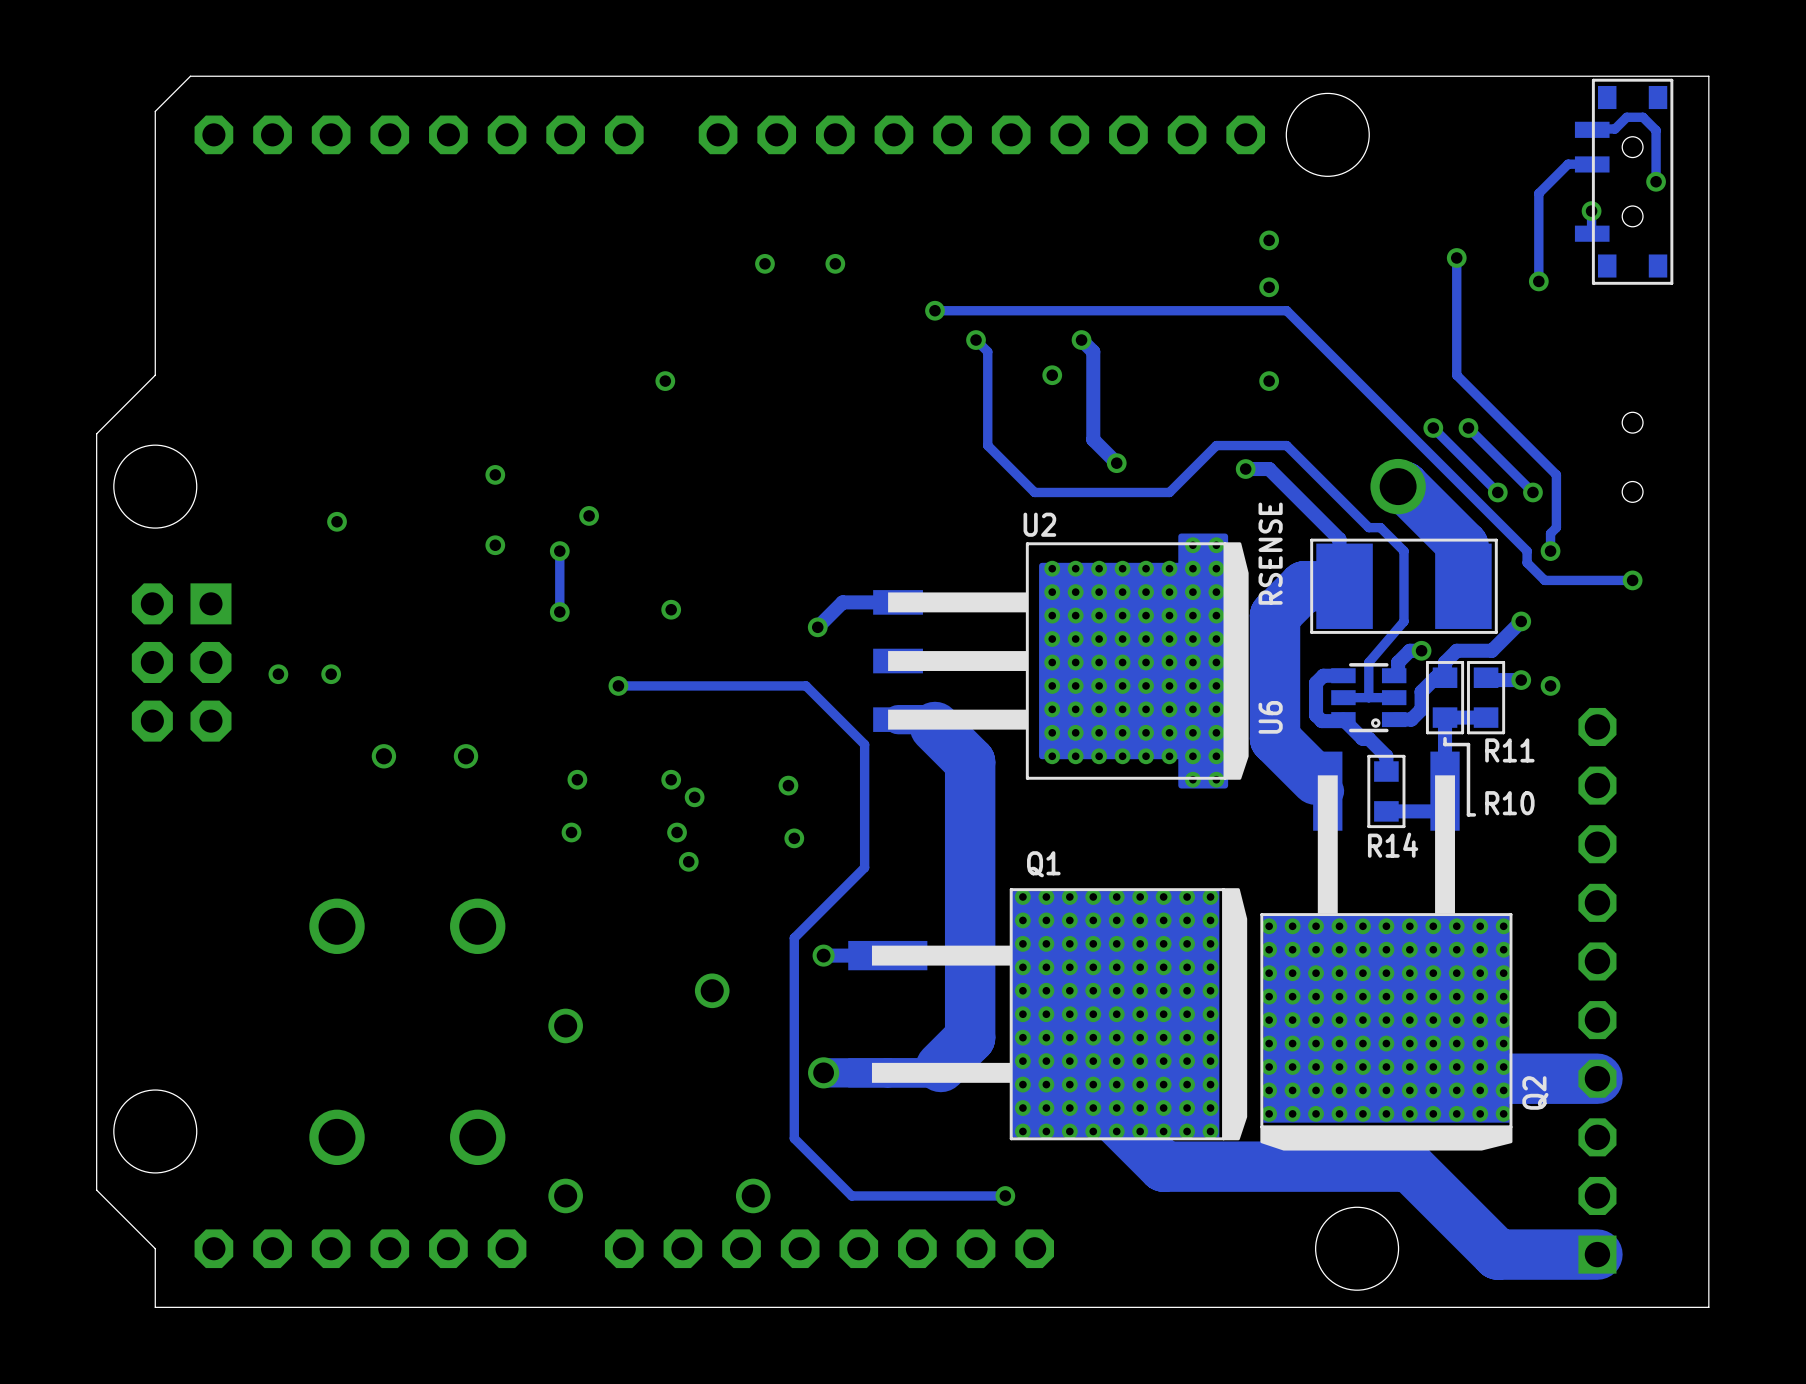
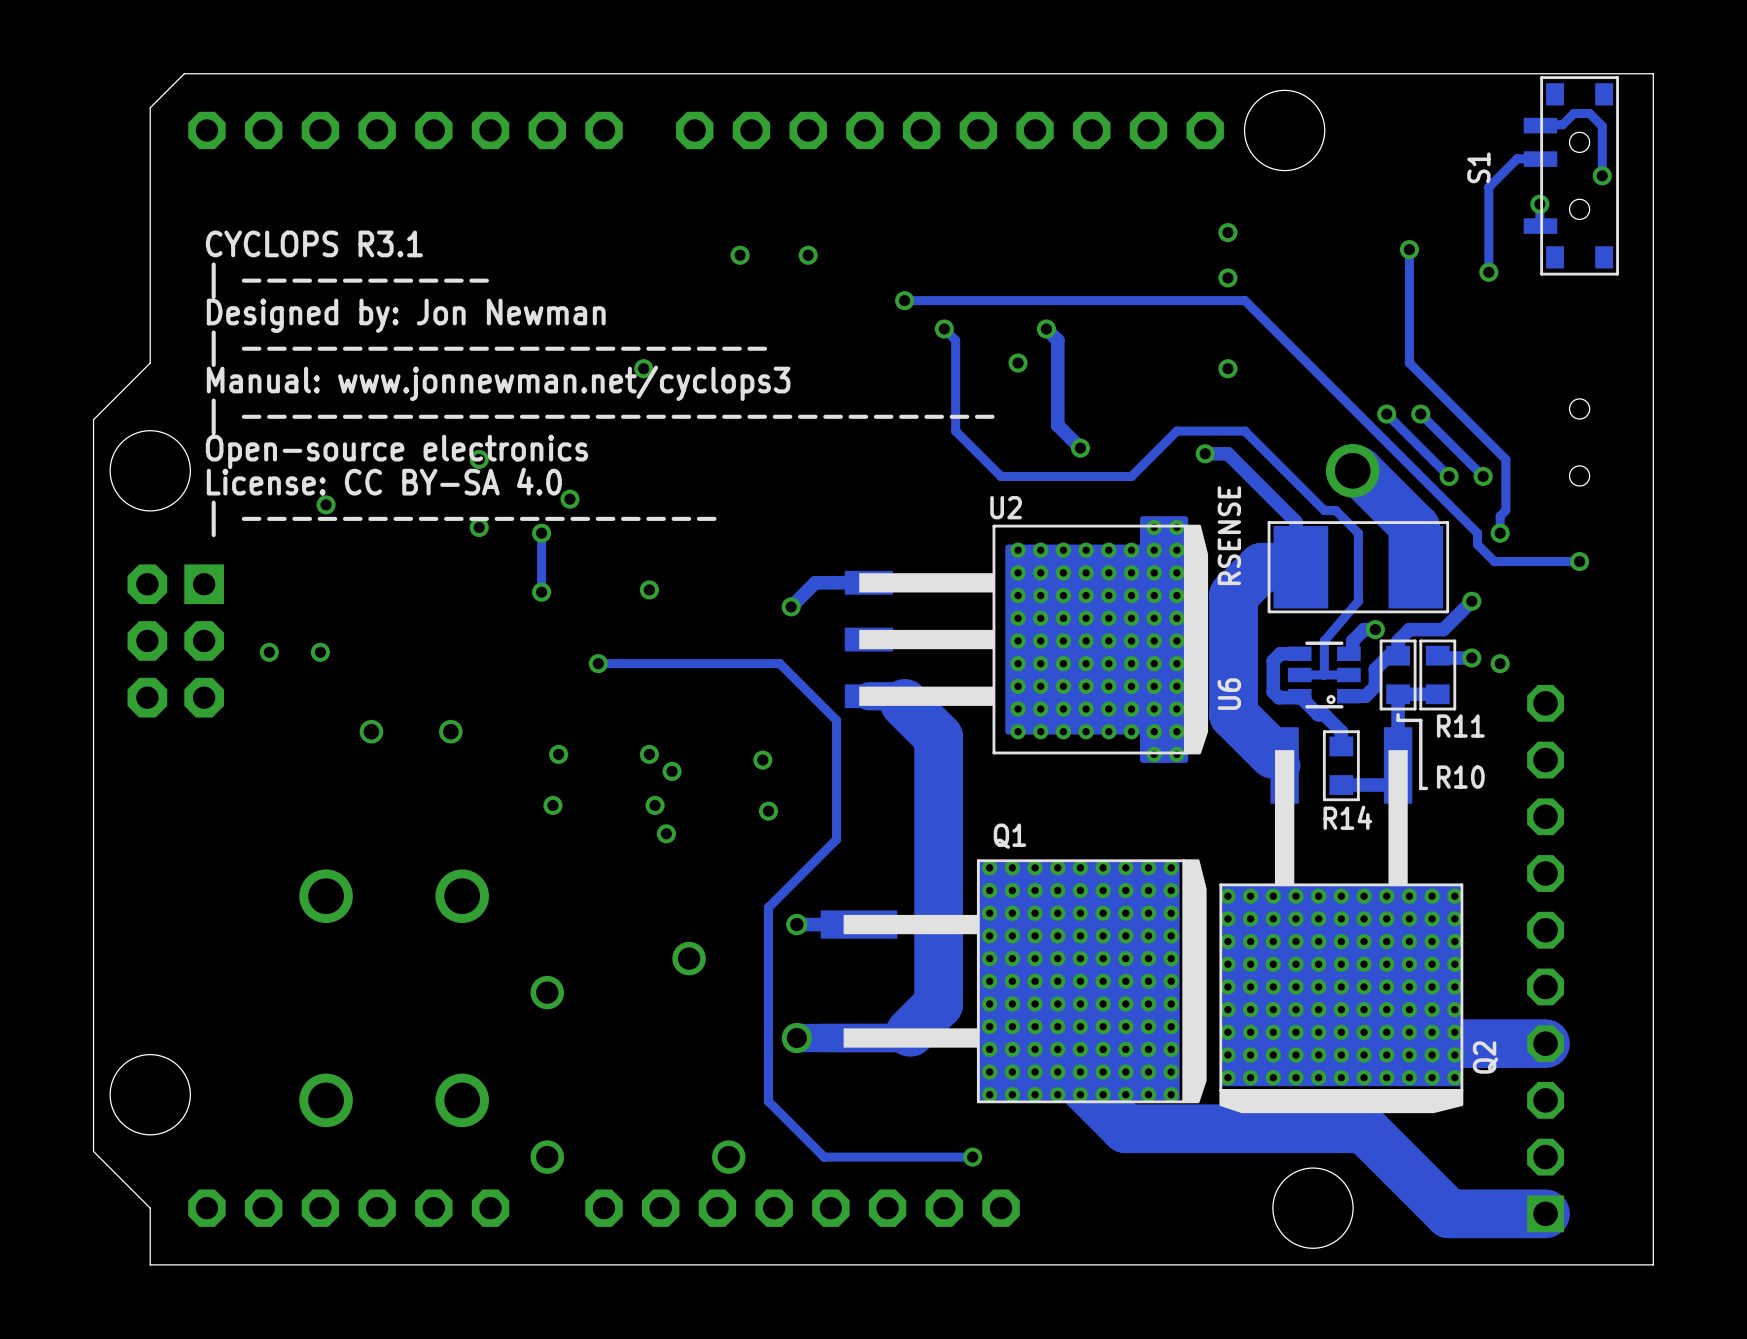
S1 name: none -> S1 (1478, 167)
text: none -> CYCLOPS R3.1 (314, 243)
text: none -> | ---------- (350, 280)
text: none -> Designed by: Jon Newman (406, 315)
text: none -> | --------------------- (489, 348)
text: none -> Manual: www.jonnewman.net/cyclops3 (498, 383)
text: none -> | ------------------------------ (603, 416)
text: none -> Open-source electronics (396, 451)
text: none -> License: CC BY-SA 4.0 (384, 481)
text: none -> | ------------------- (464, 518)

